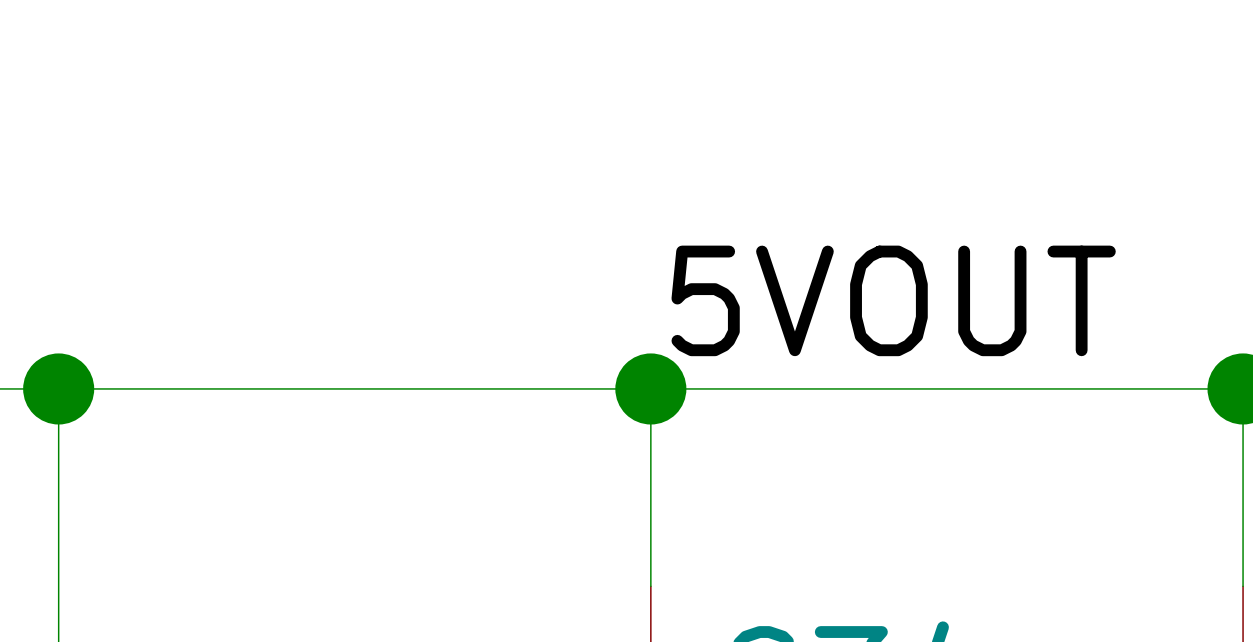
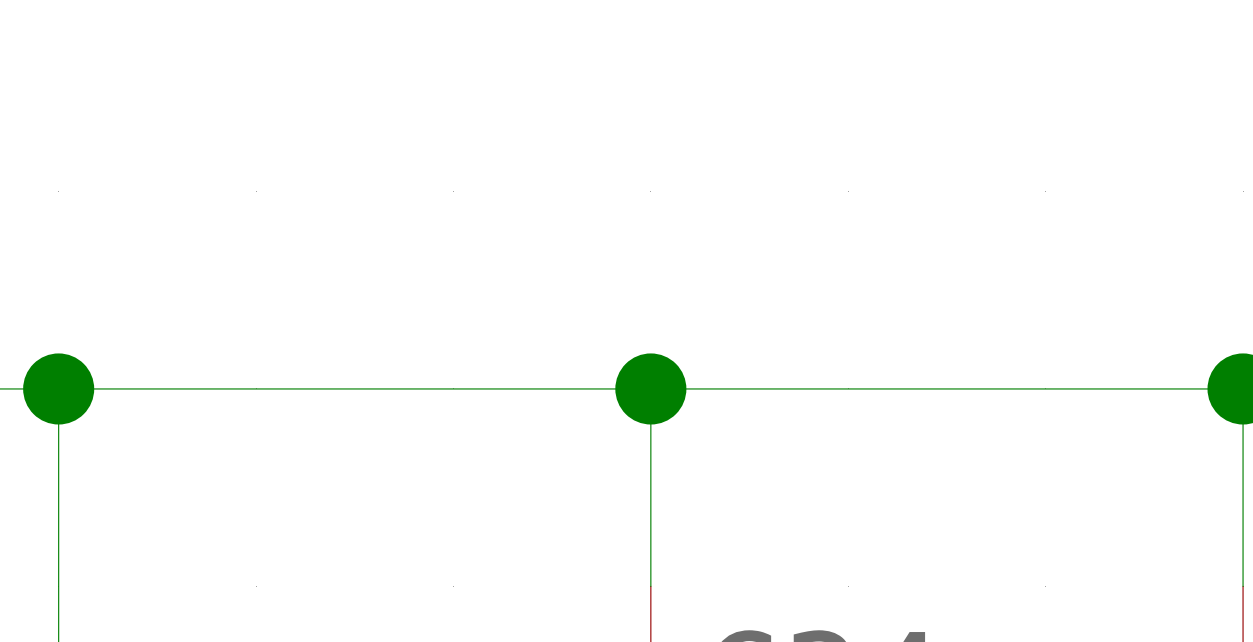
label: 5VOUT (893, 300) -> none

